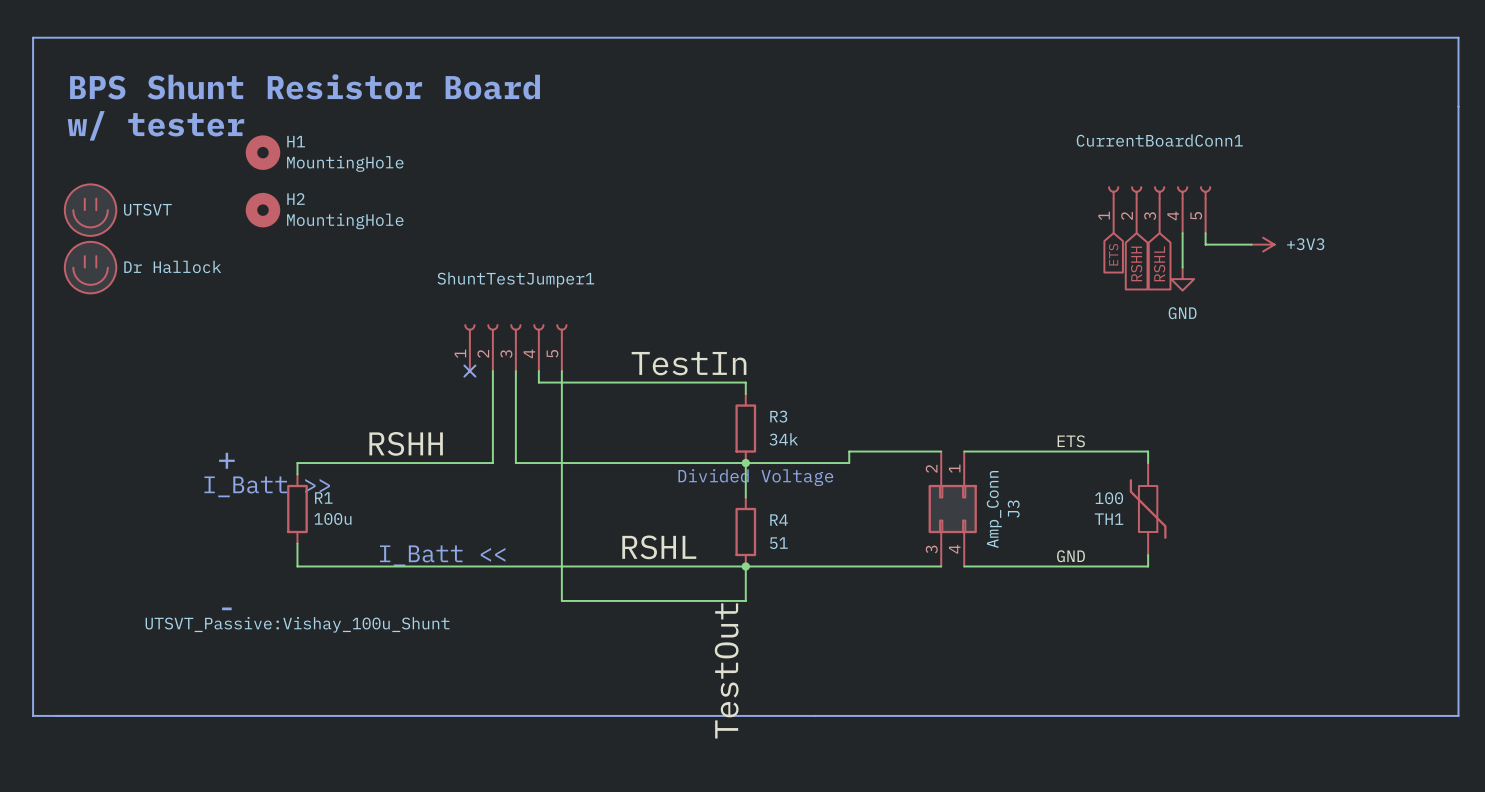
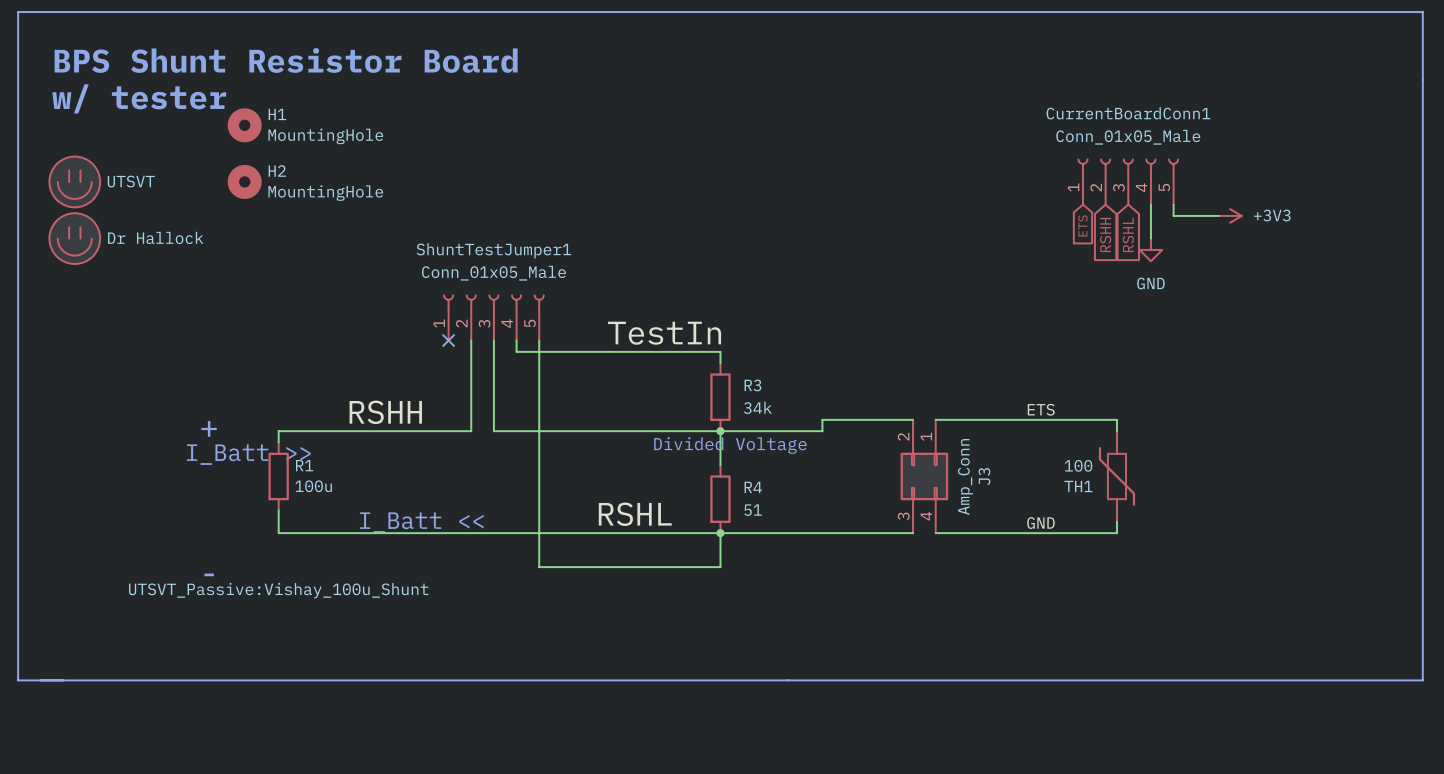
CurrentBoardConn1 value: none -> Conn_01x05_Male (1128, 137)
ShuntTestJumper1 value: none -> Conn_01x05_Male (493, 273)
label: TestOut (726, 670) -> none

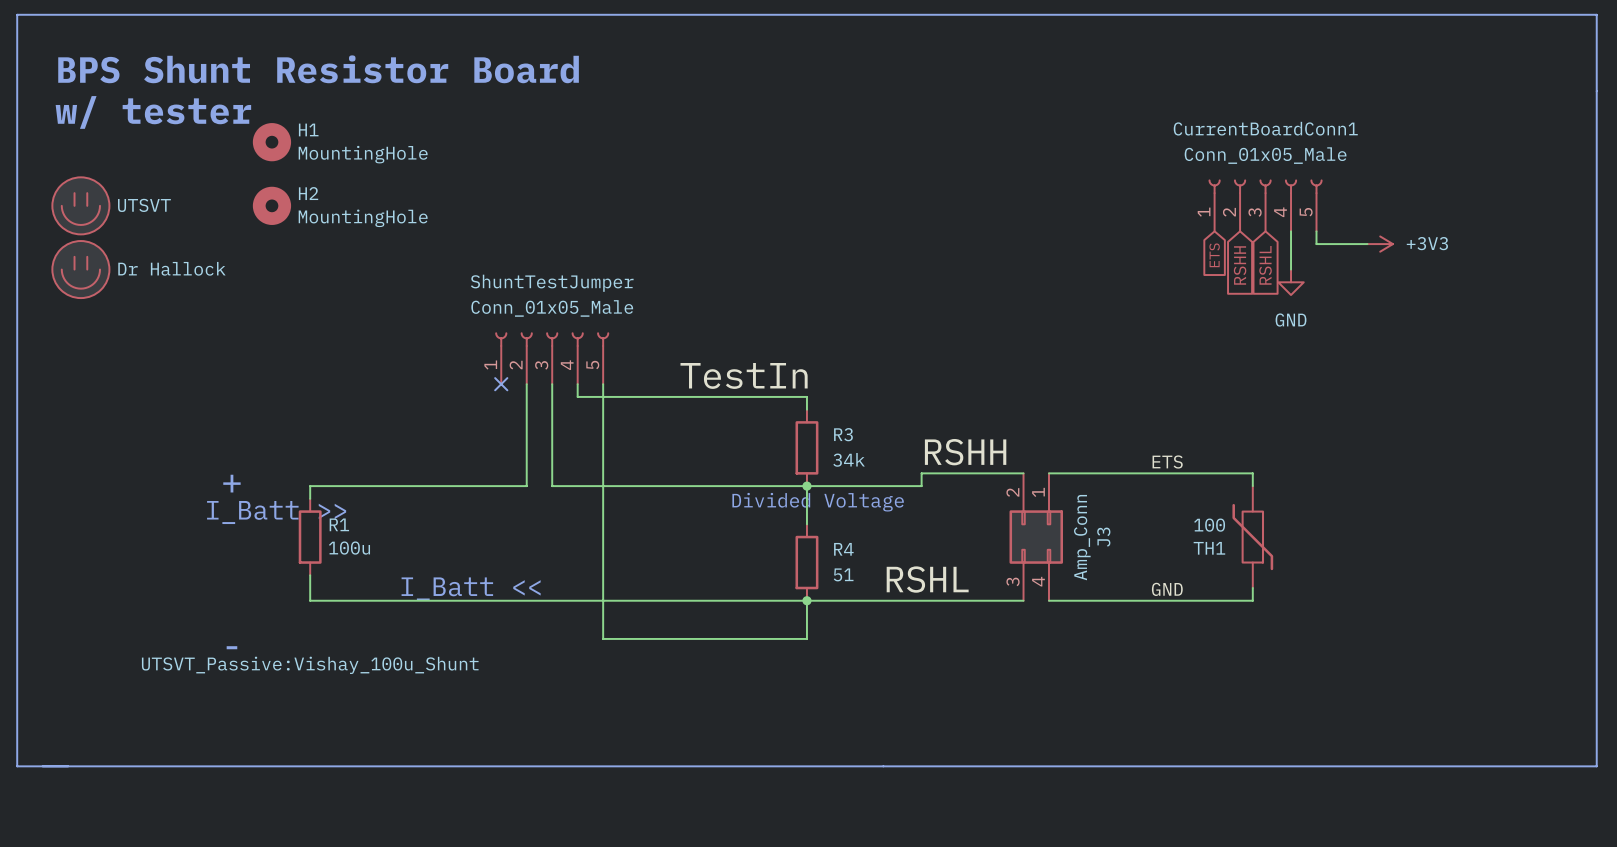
ShuntTestJumper1 name: ShuntTestJumper1 (493, 250) -> ShuntTestJumper (552, 283)
label: none -> RSHH (965, 452)
label: RSHH (385, 412) -> none
label position: RSHL (635, 514) -> RSHL (927, 579)

